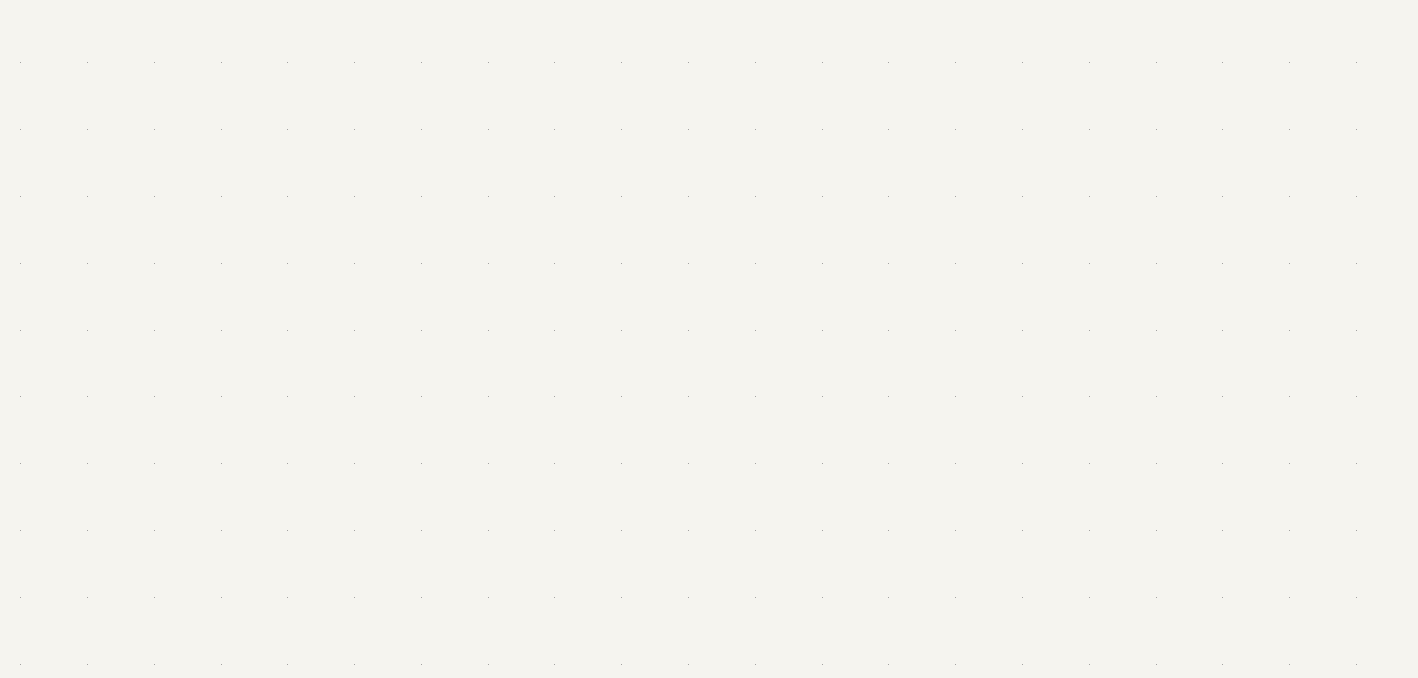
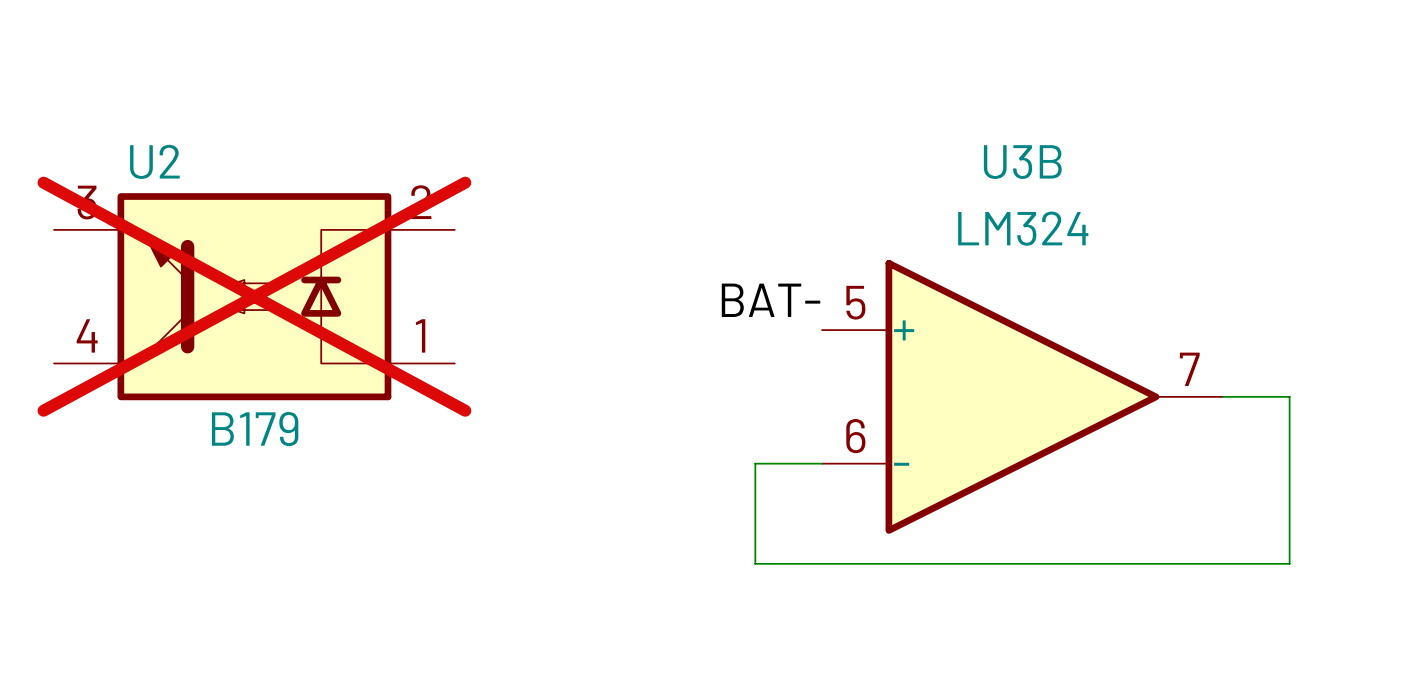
U2: none -> B179 (254, 296)
label: none -> BAT- (771, 300)
U3B: none -> LM324 (1022, 396)
wire: none -> (1222, 396) (1289, 396) (1289, 563) (755, 563) (755, 463) (822, 463)

